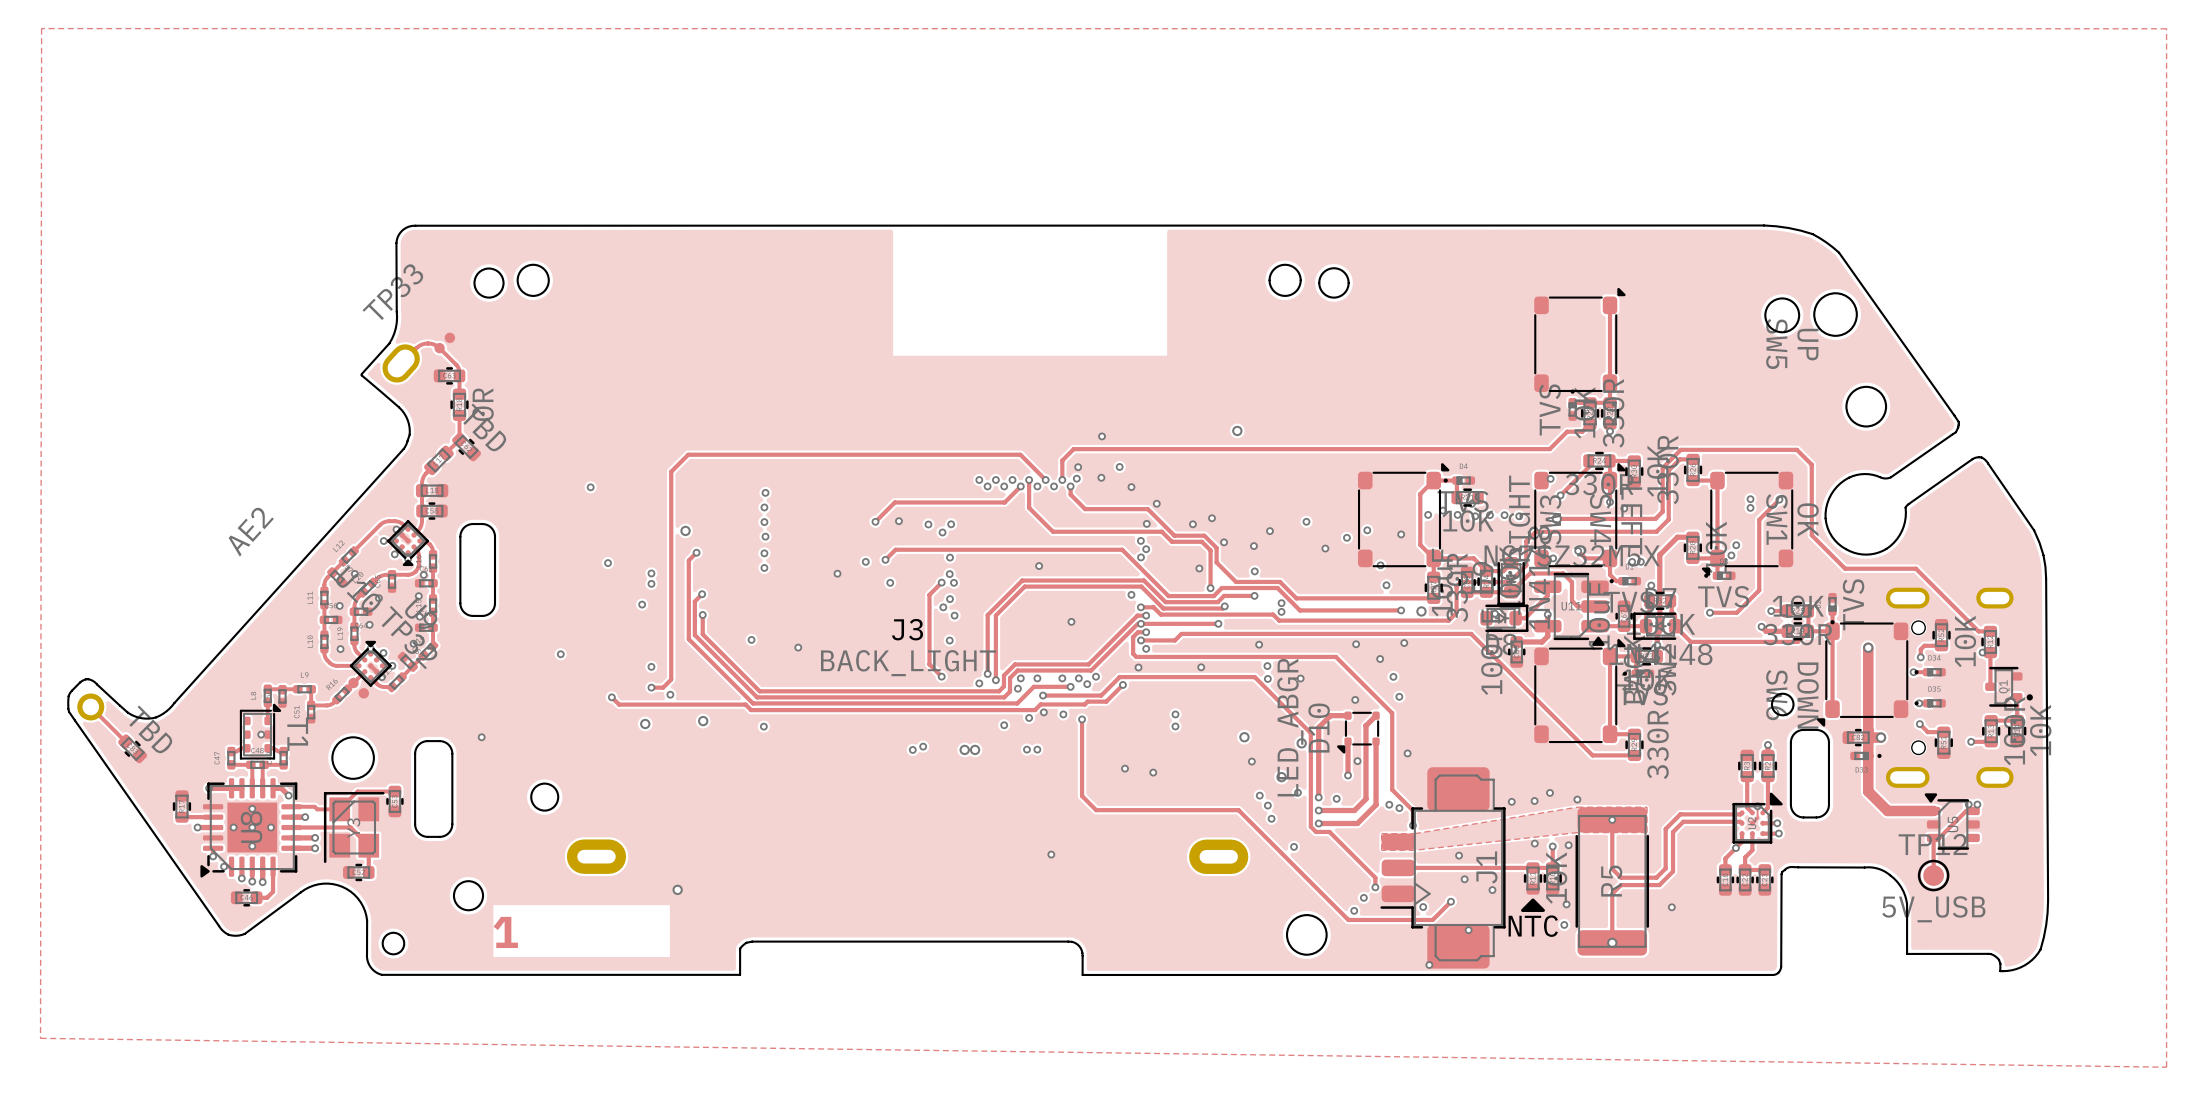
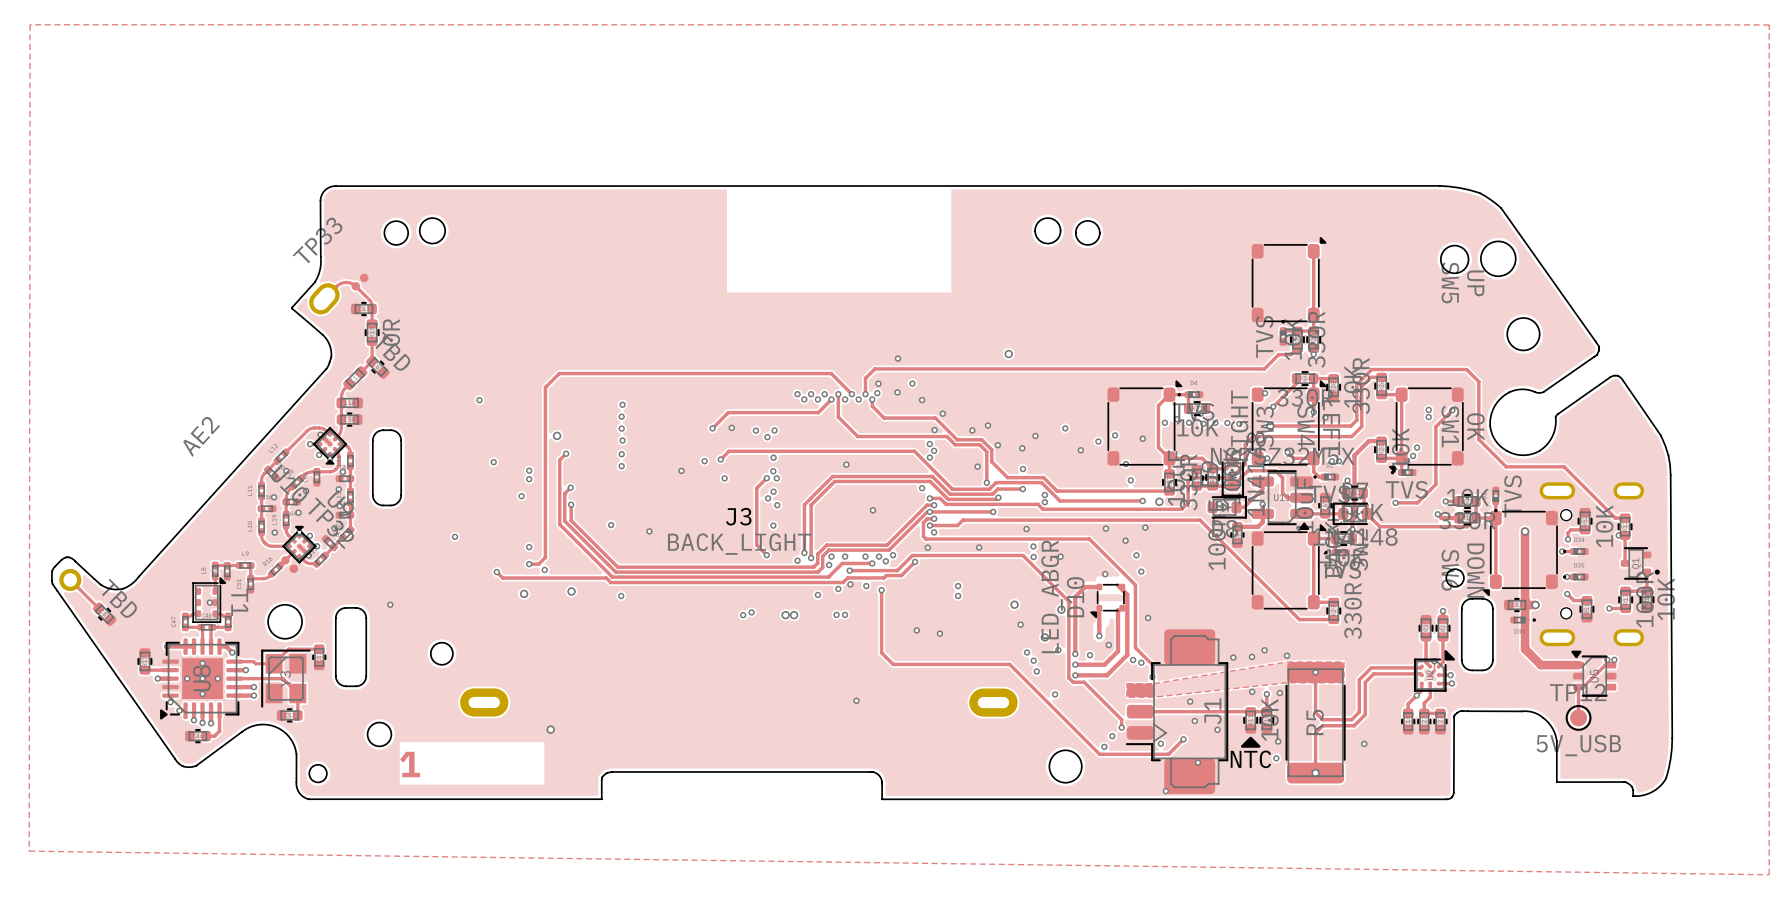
track: (1376, 715) (1365, 725) (1365, 799) -> (1118, 610) (1118, 651) (1114, 655)
track: (1376, 741) (1376, 804) -> (1118, 585) (1127, 594) (1127, 655) (1122, 660)
via position: (1357, 761) -> (1108, 645)

